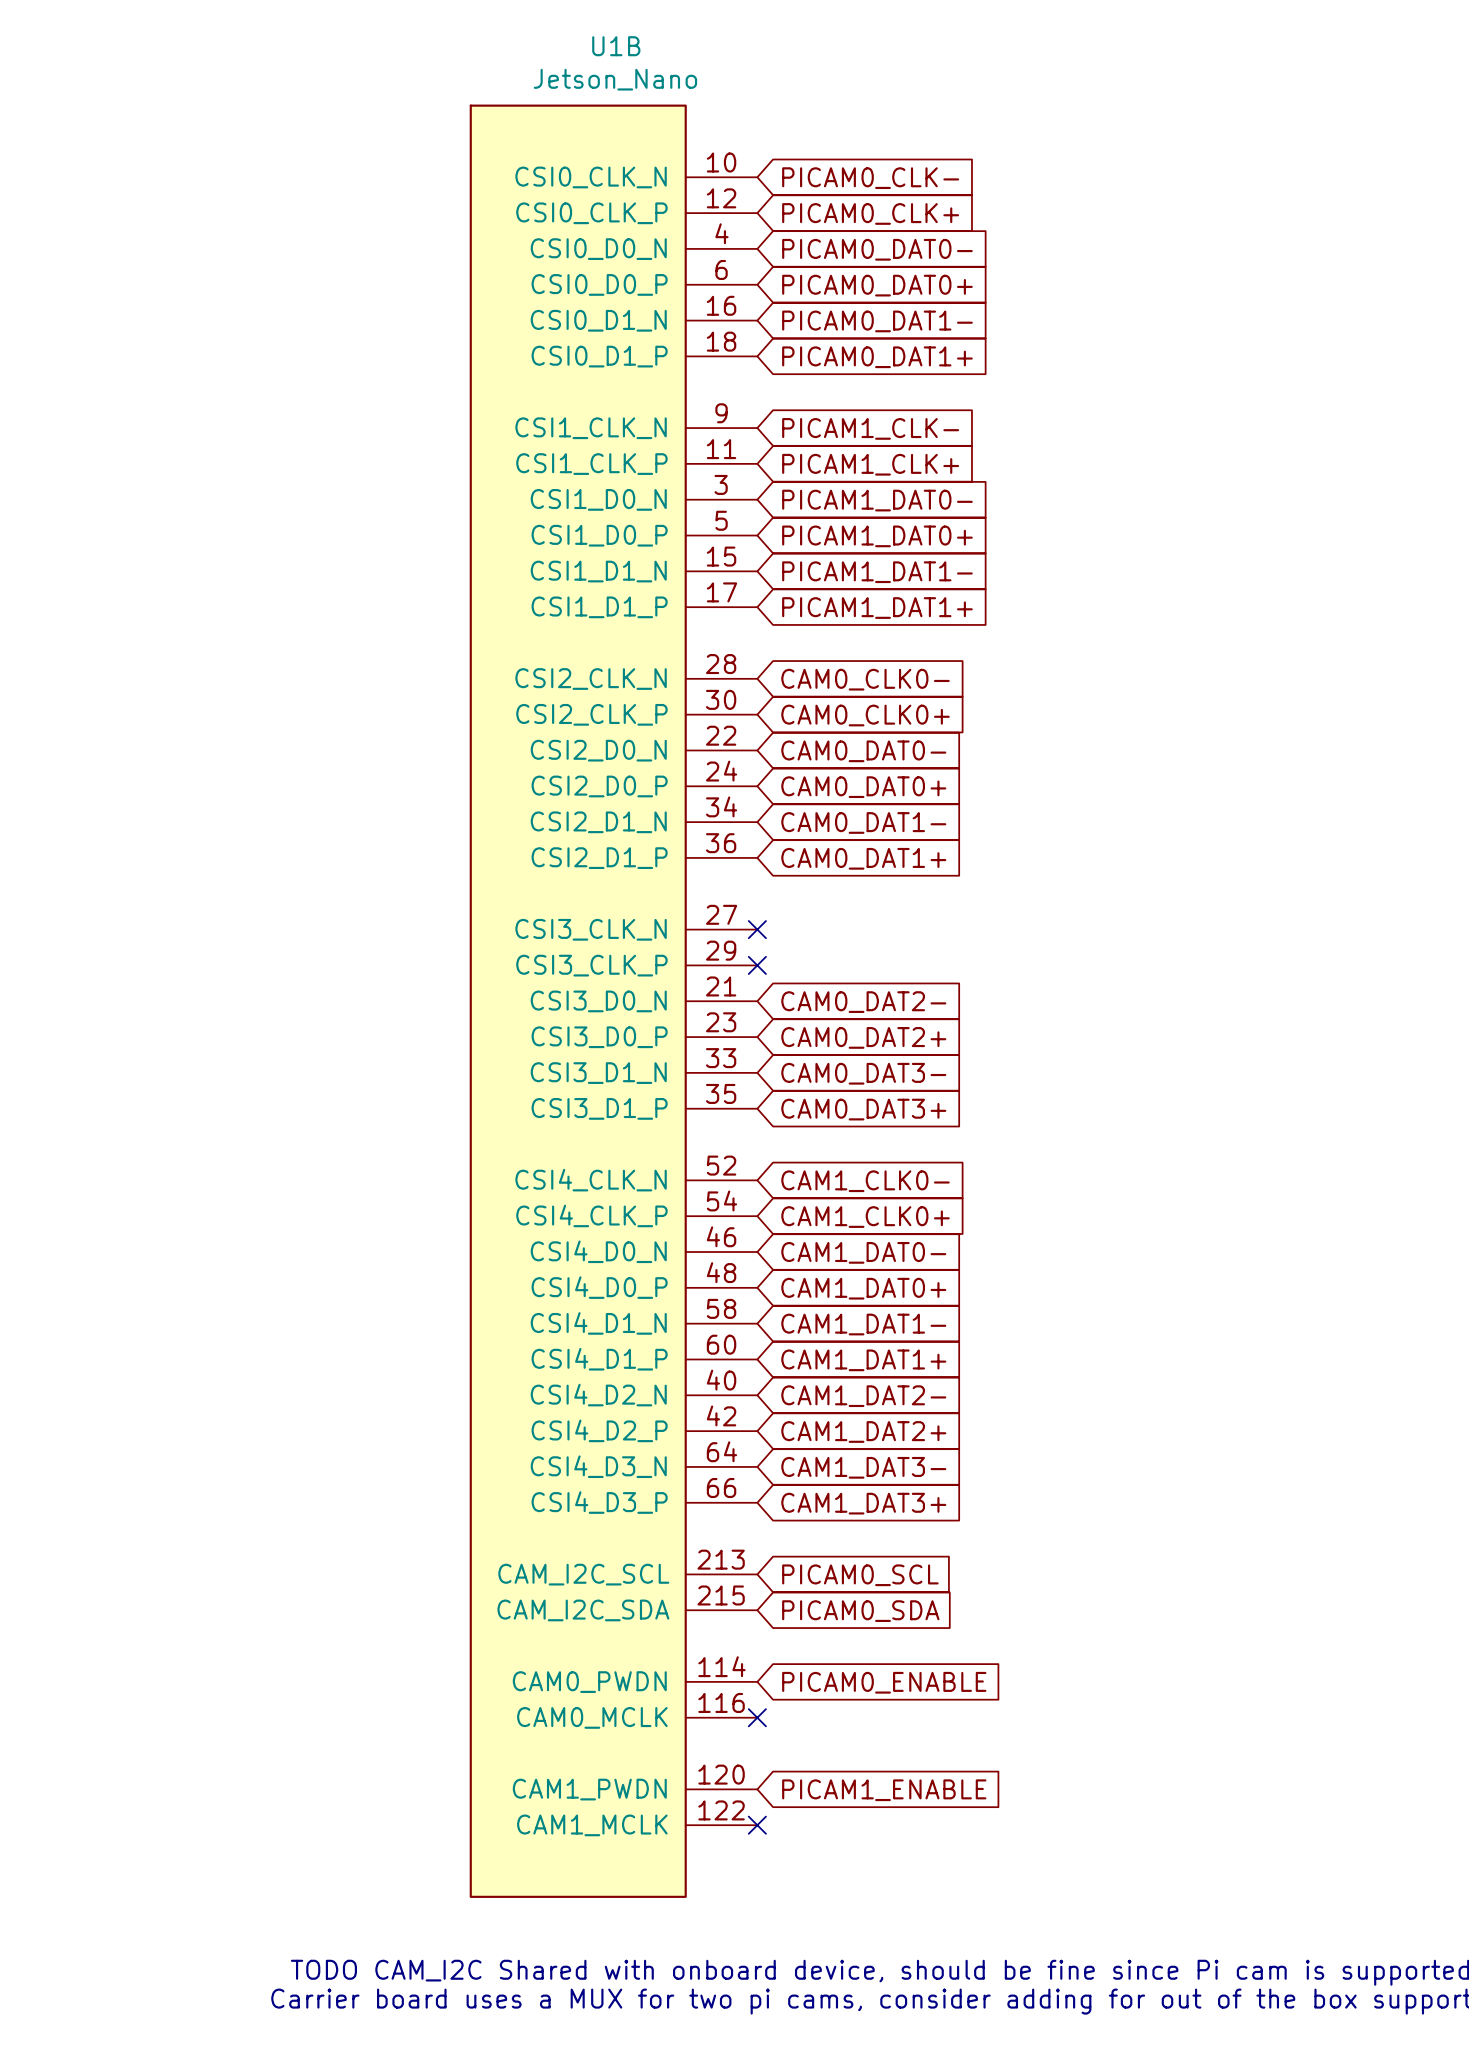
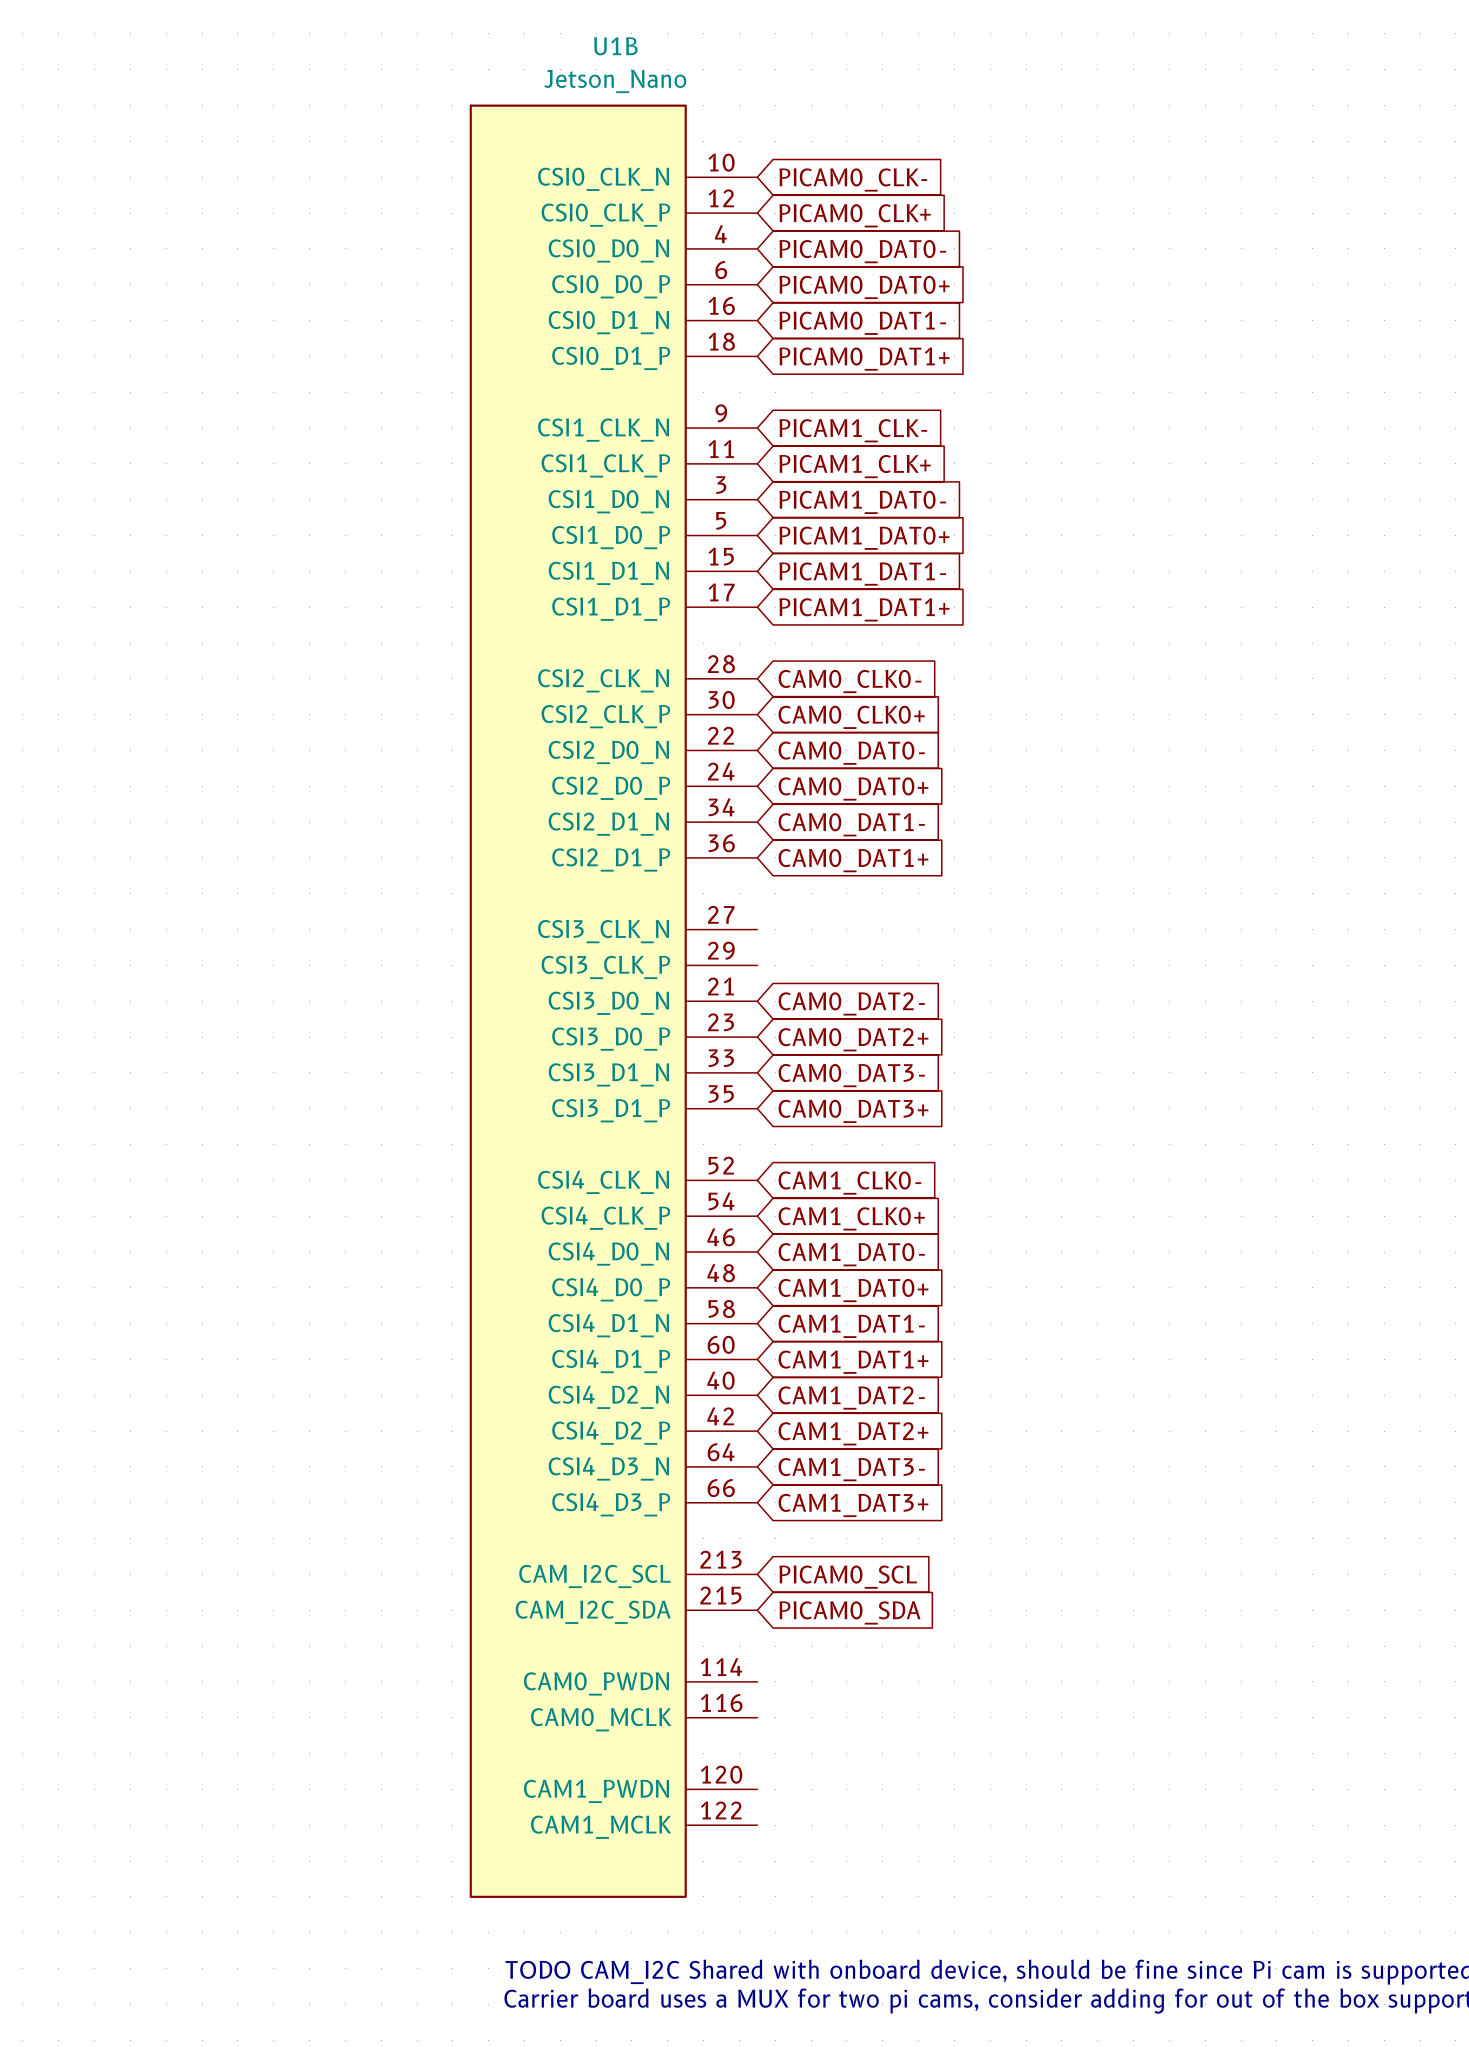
no-connect mark: (757, 929) -> none
no-connect mark: (757, 965) -> none
global label: PICAM0_ENABLE (884, 1682) -> none
no-connect mark: (757, 1717) -> none
global label: PICAM1_ENABLE (884, 1790) -> none
no-connect mark: (757, 1825) -> none

